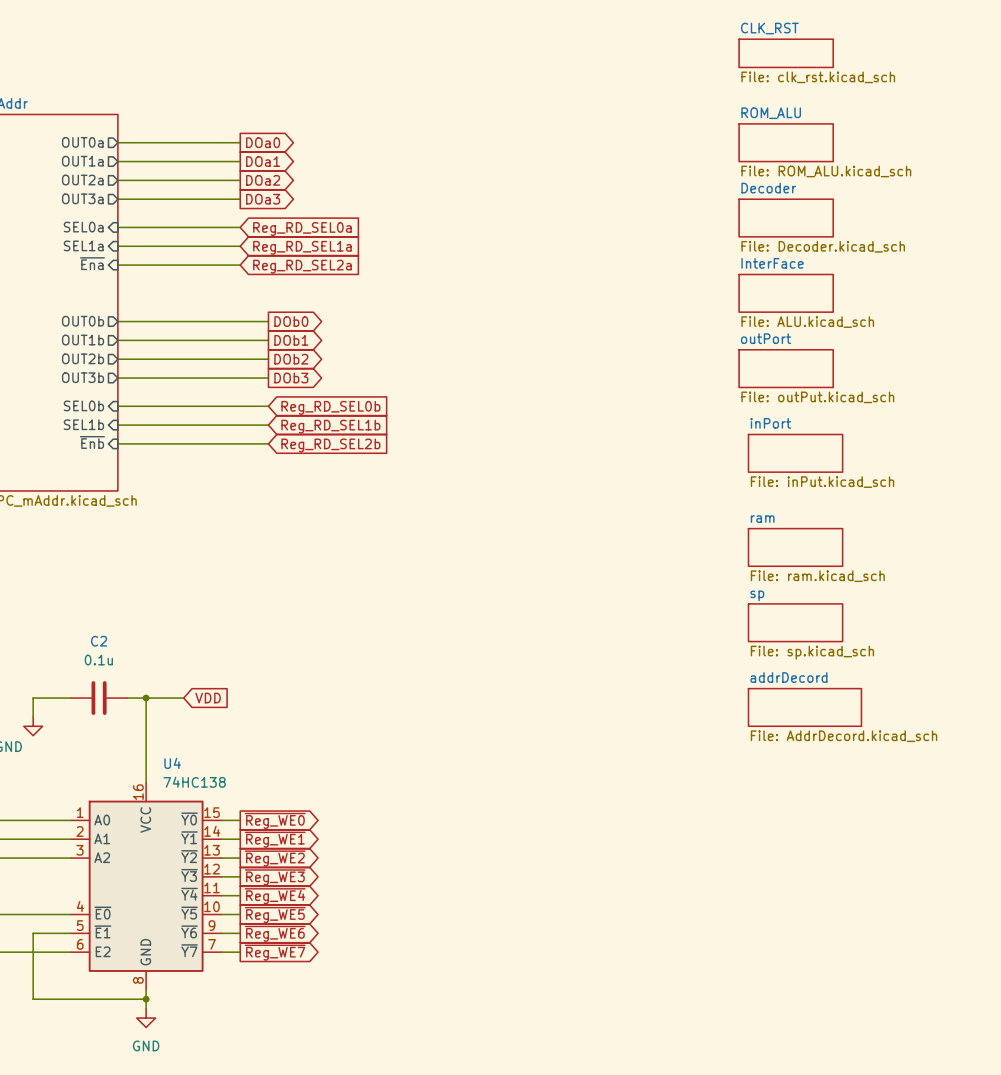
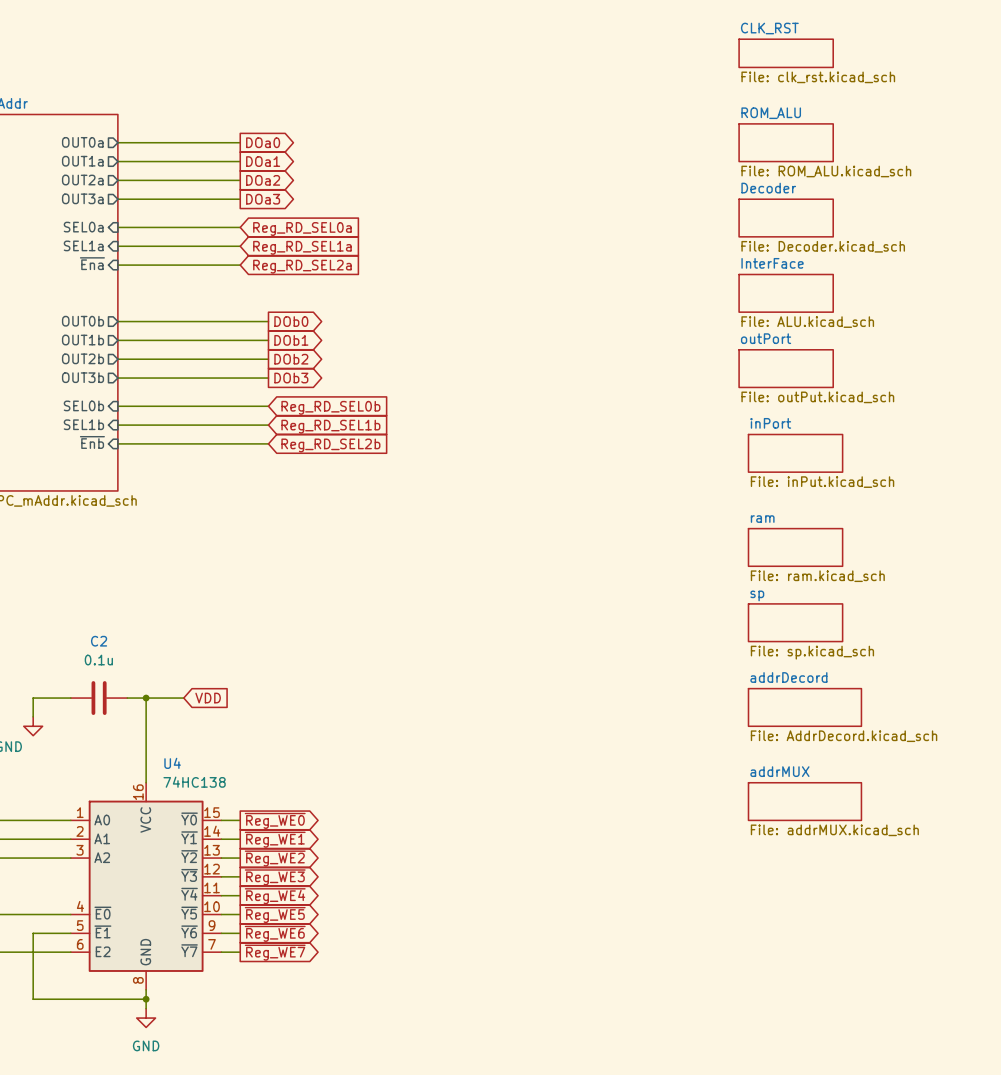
sheet addrMUX: none -> File: addrMUX.kicad_sch (804, 801)

